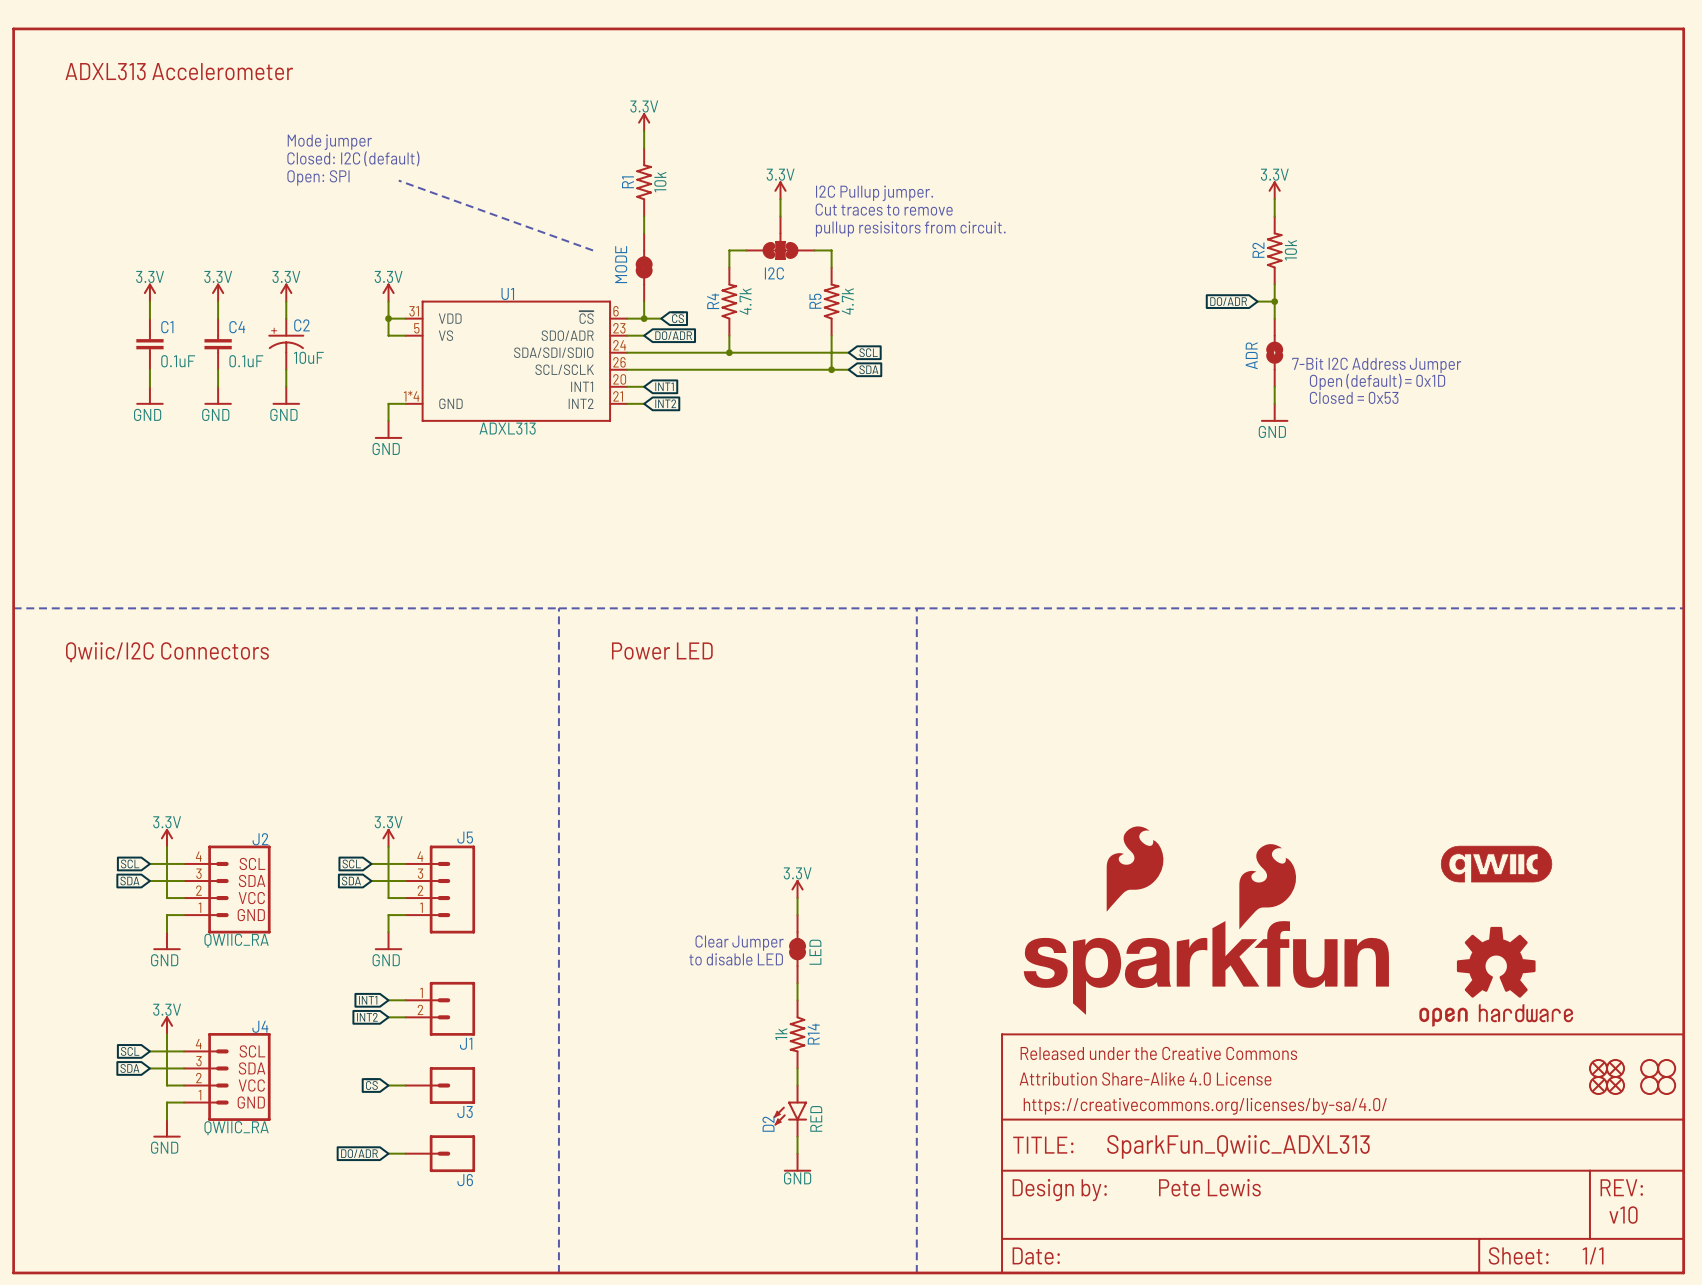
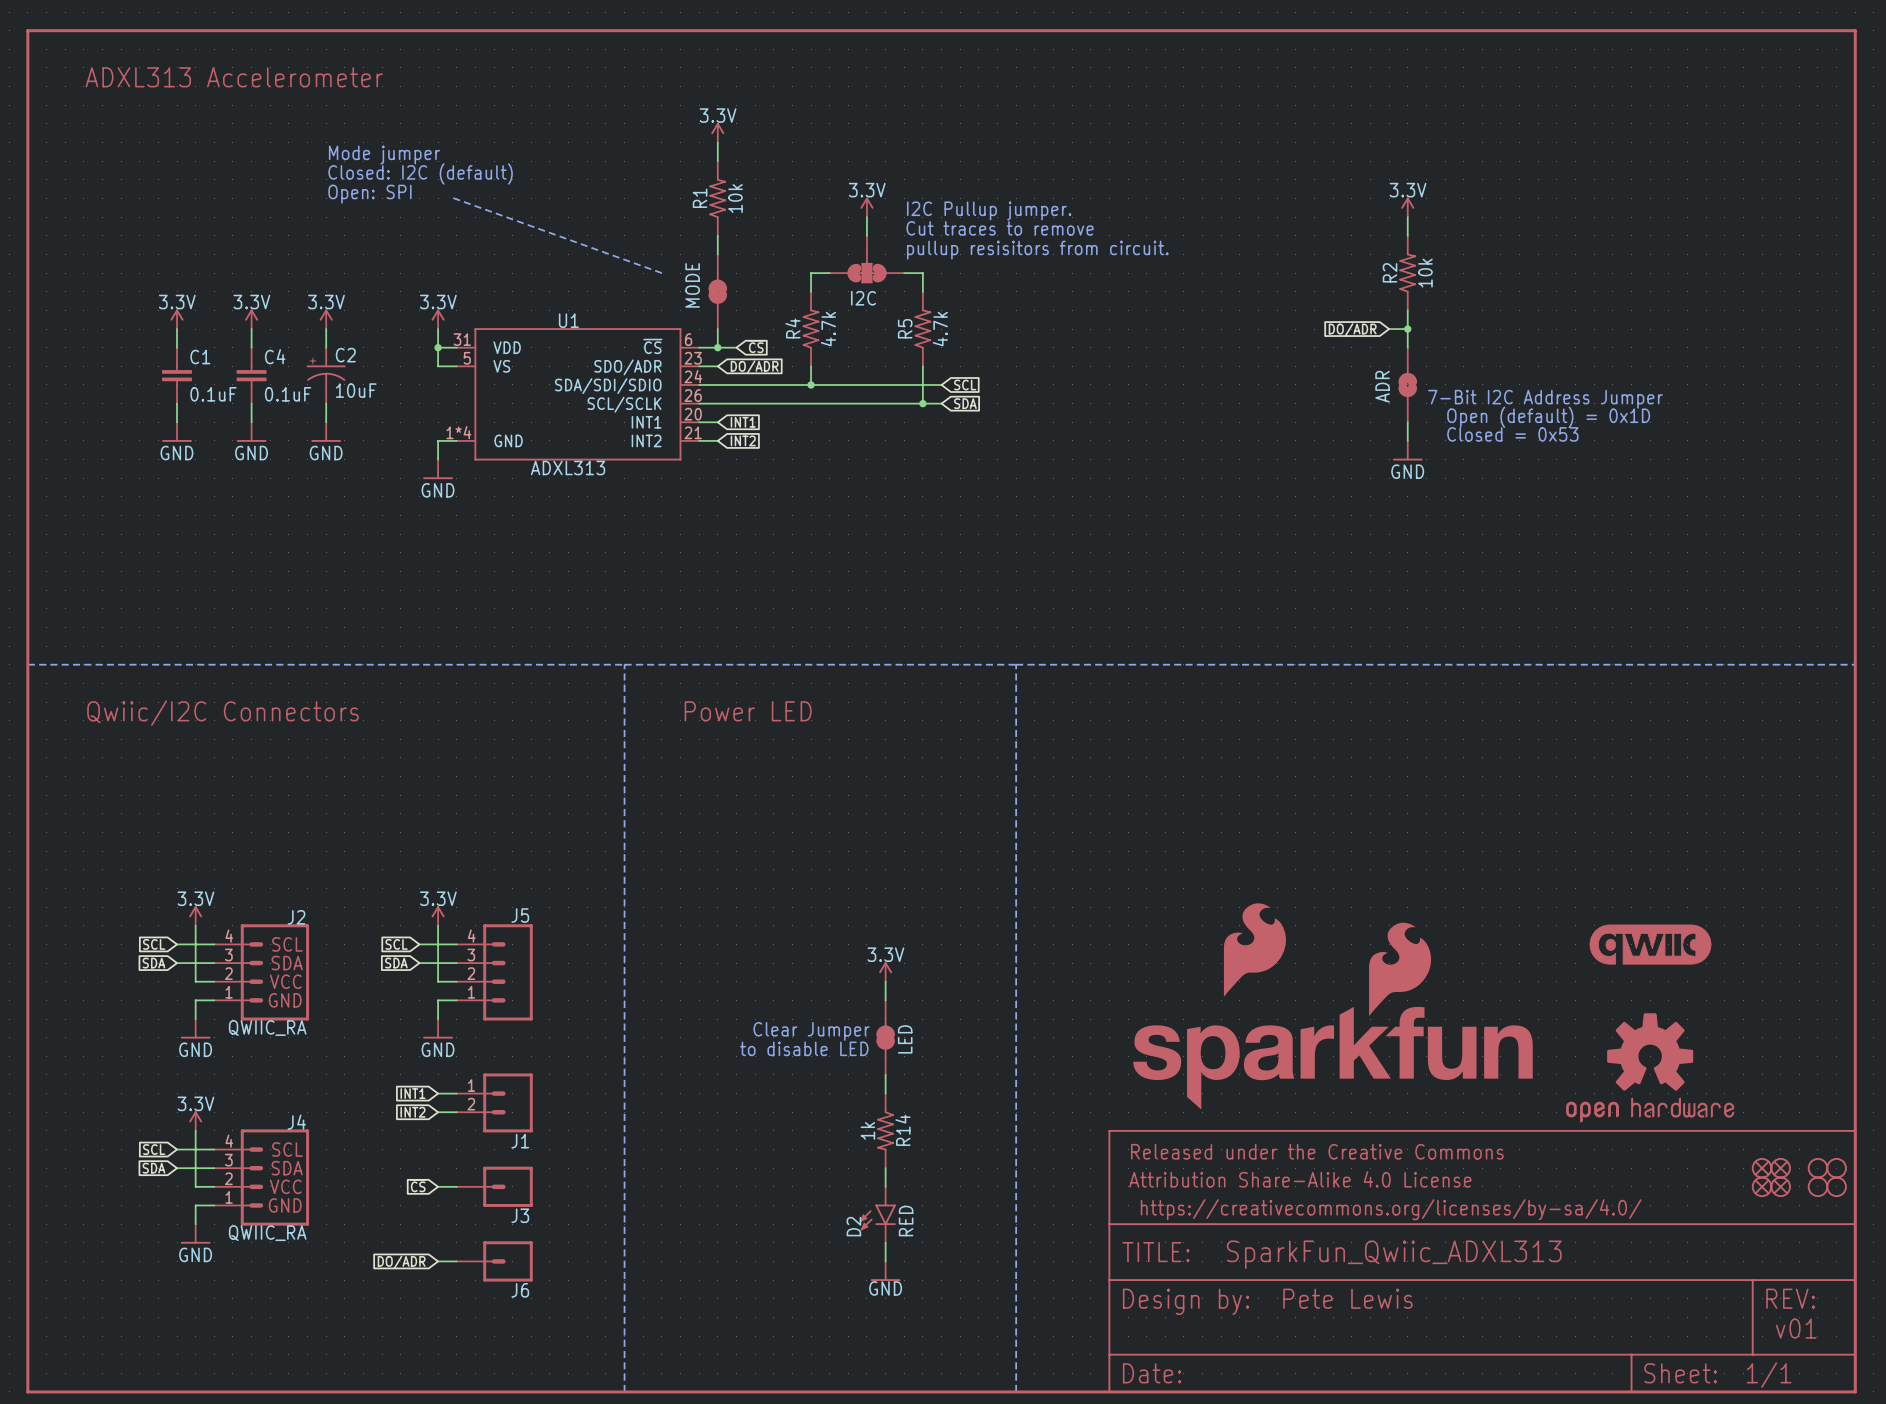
text: v10 (1623, 1215) -> v01 (1796, 1328)

